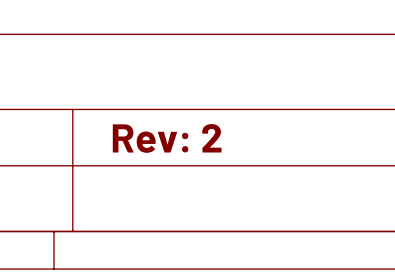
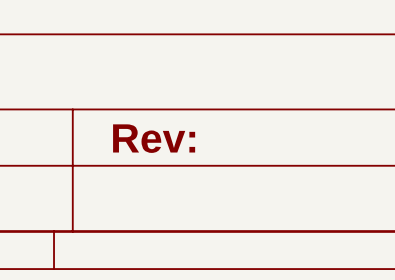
title block: Rev: 2 (167, 138) -> Rev: (154, 138)

